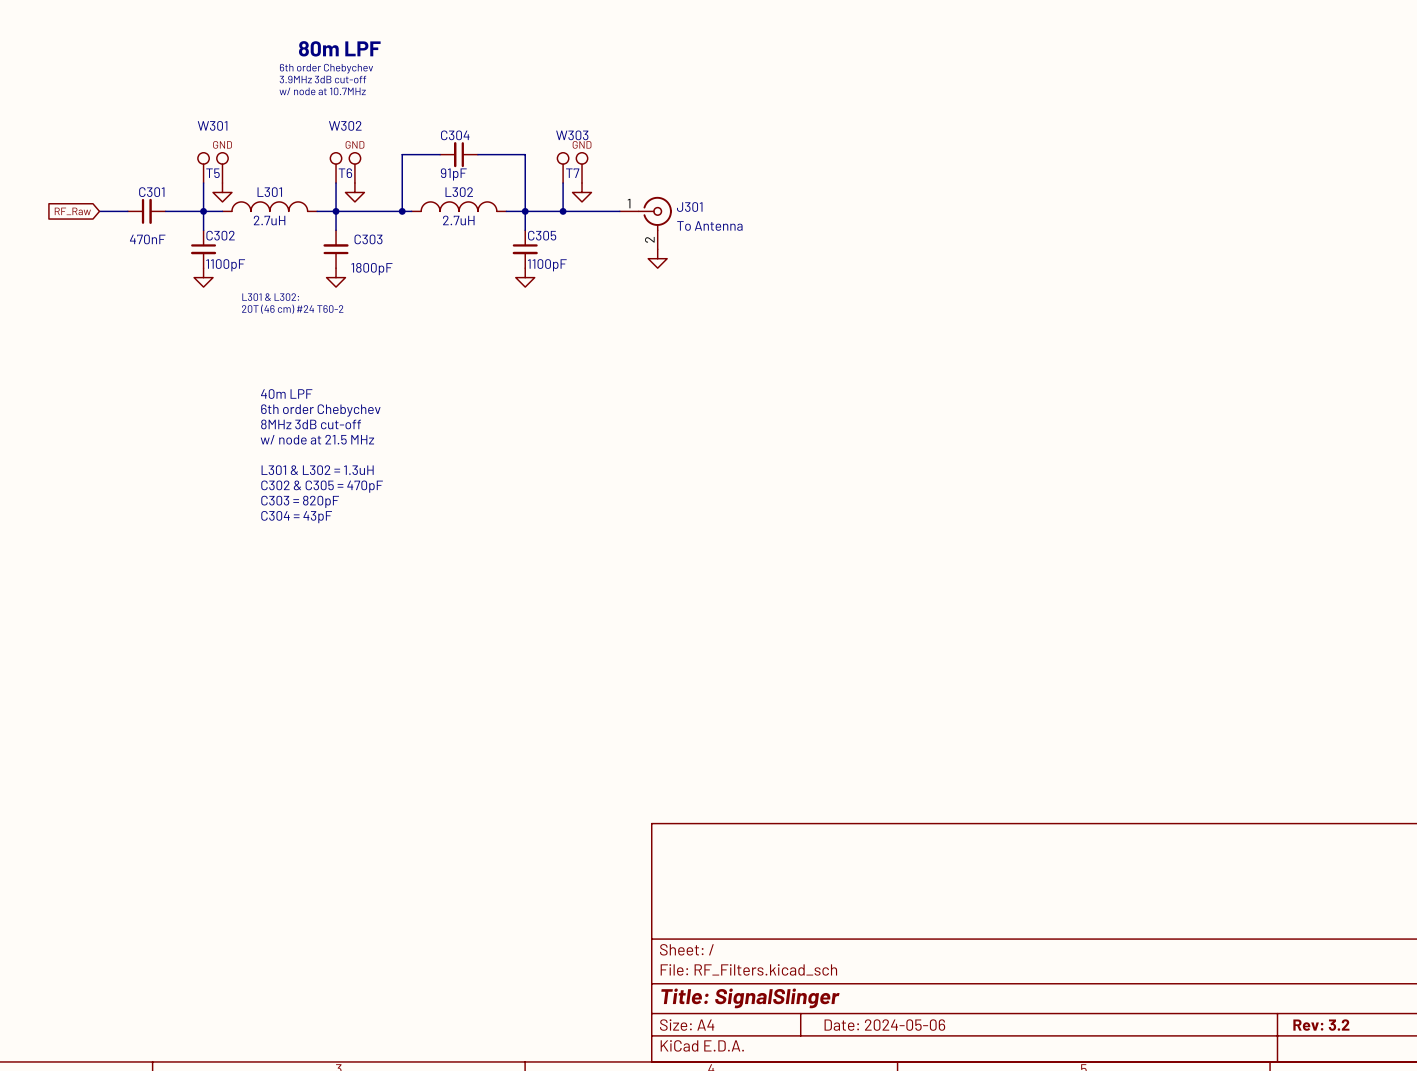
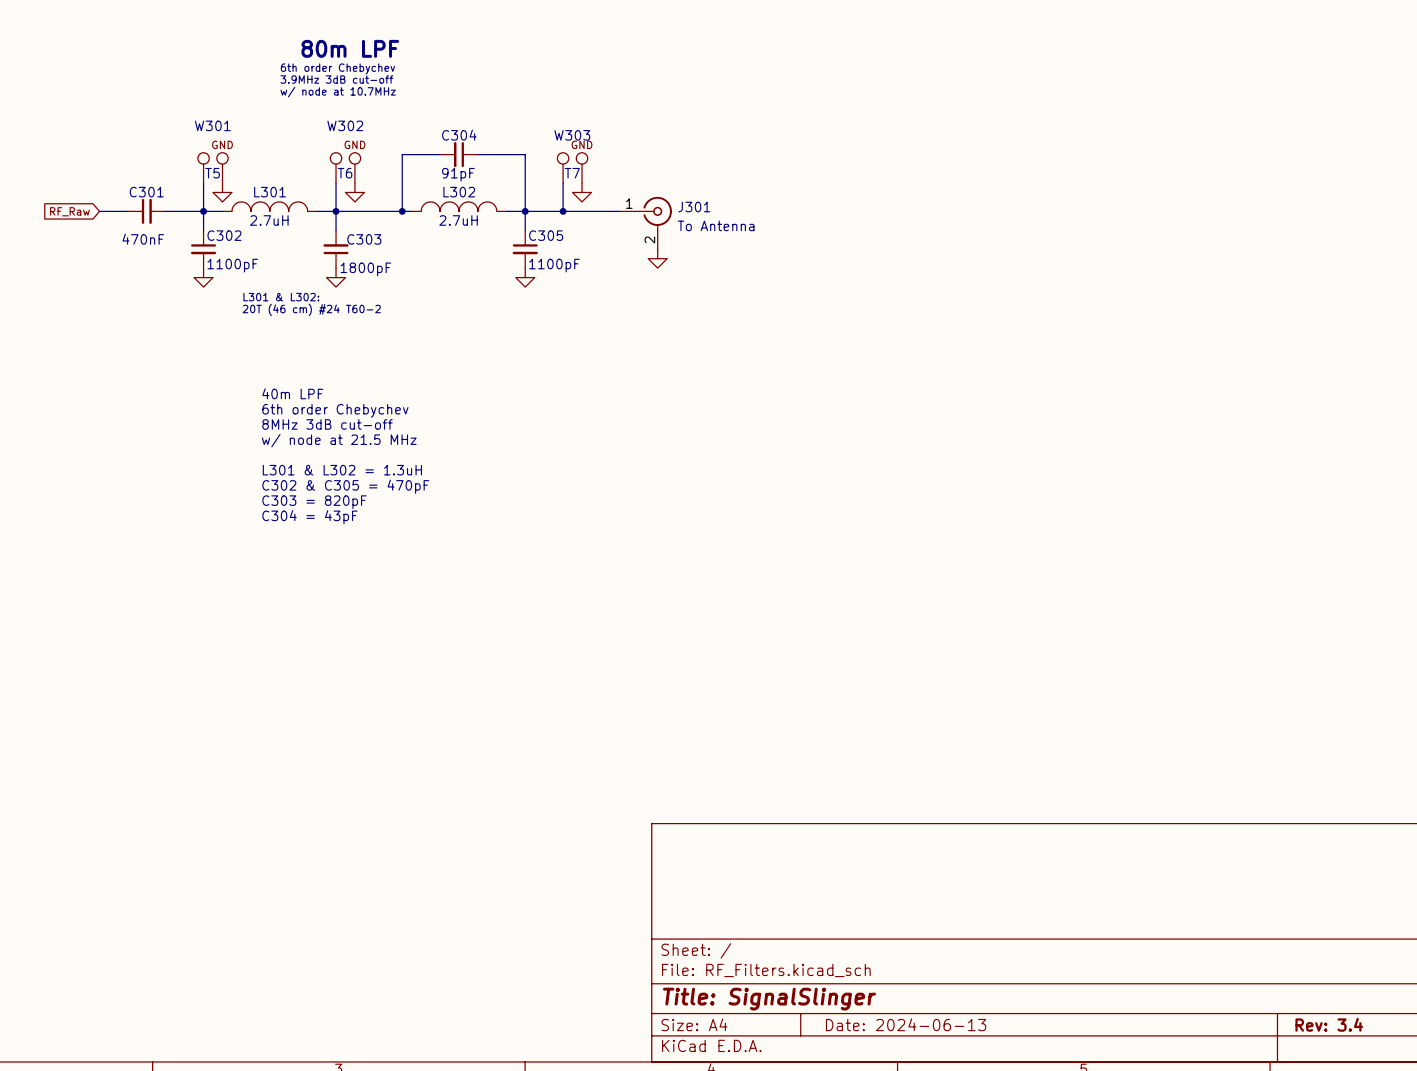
title block: Date: 2024-05-06 (884, 1025) -> Date: 2024-06-13 (906, 1024)
title block: Rev: 3.2 (1321, 1025) -> Rev: 3.4 (1329, 1024)

